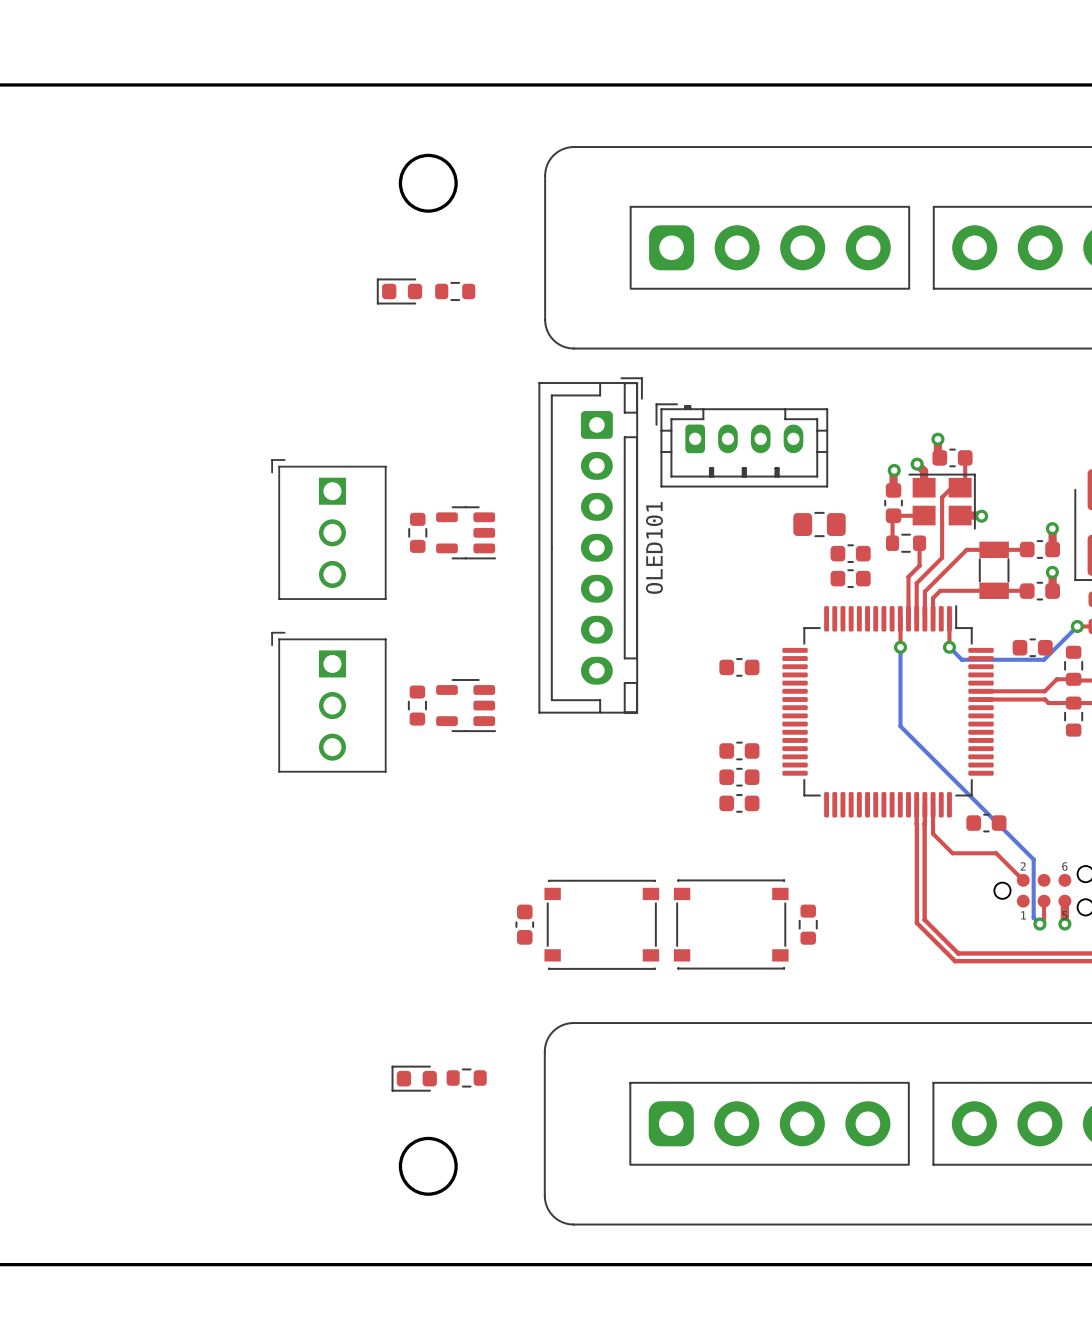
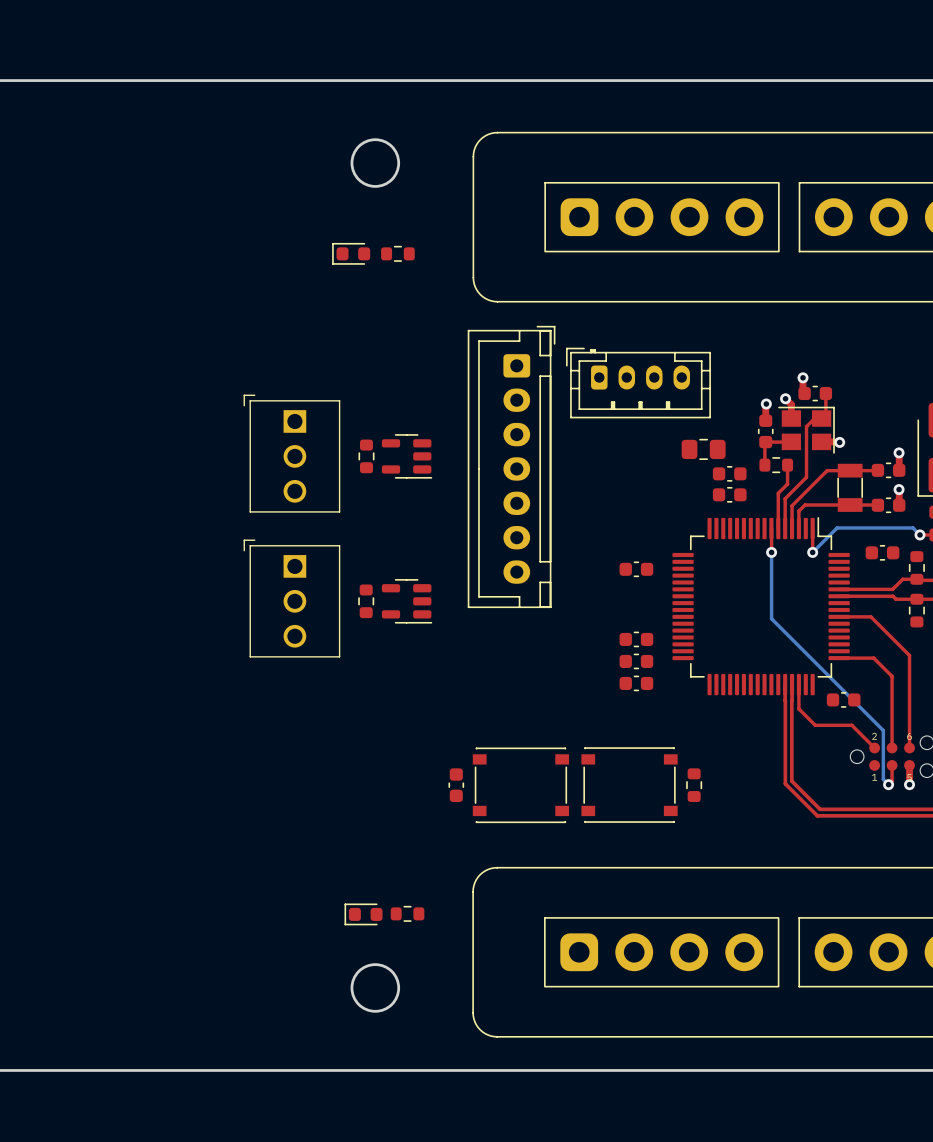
OLED101 name: OLED101 (654, 547) -> none
bottom track: (1077, 626) (1044, 659) (961, 659) (949, 647) -> (920, 534) (913, 527) (837, 527) (812, 552)
top track: none -> (839, 616) (870, 616) (909, 655) (909, 747)
top track: none -> (839, 658) (873, 658) (892, 676) (892, 747)

